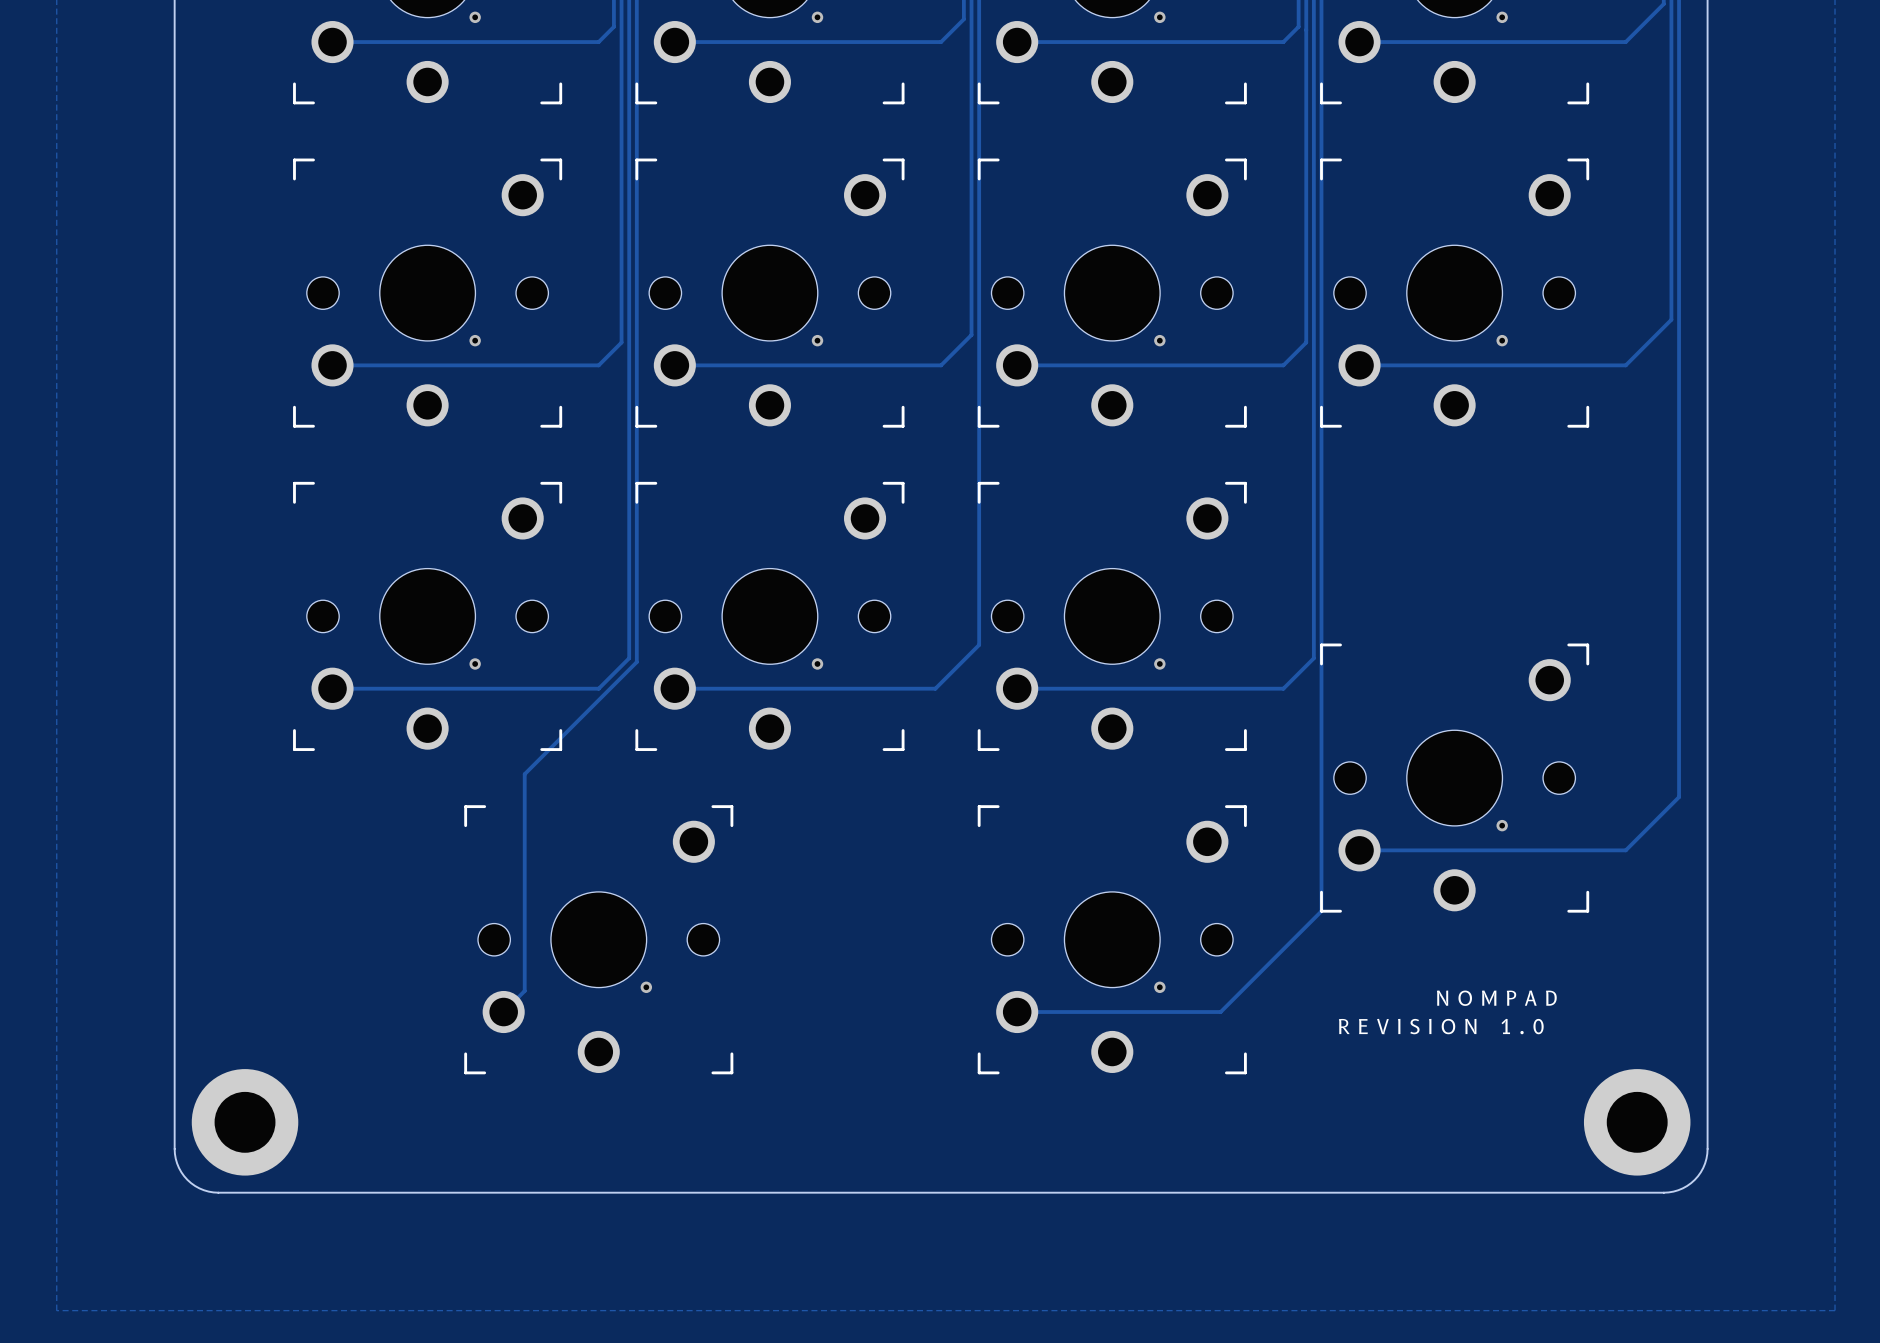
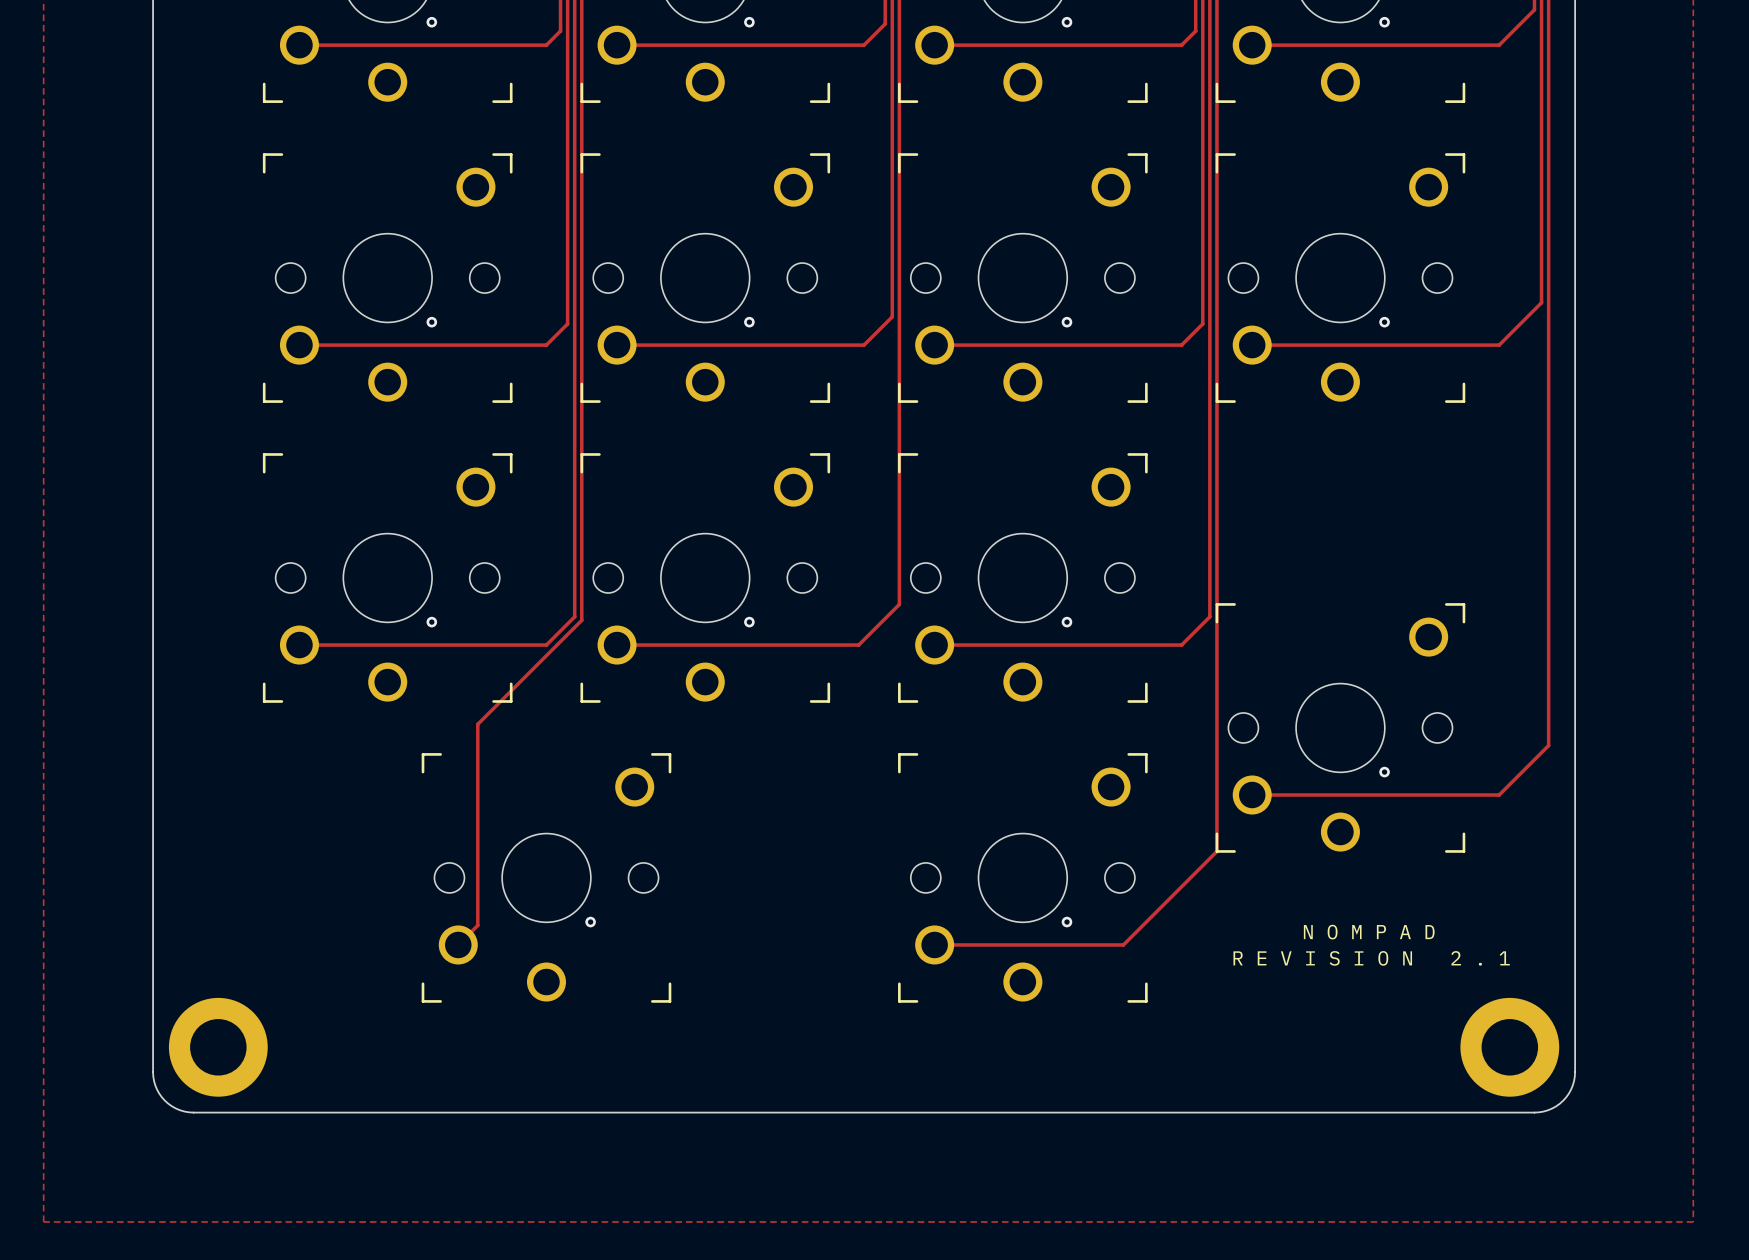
text: R E V I S I O N 1 . 0 (1441, 1026) -> R E V I S I O N 2 . 1 (1371, 958)

